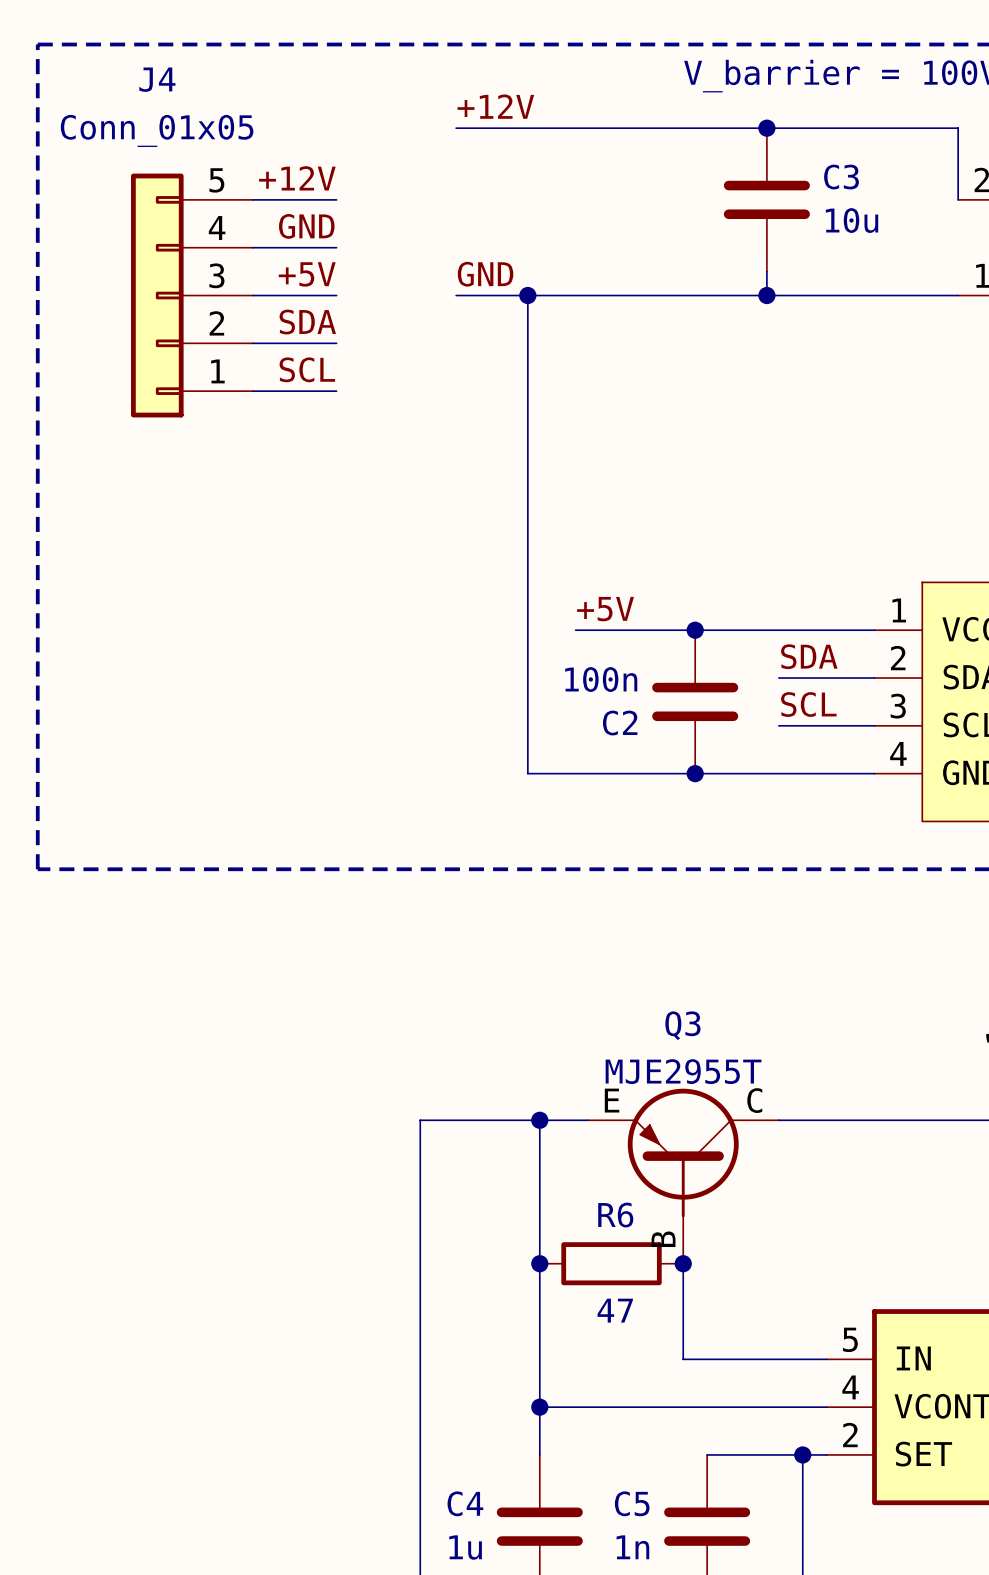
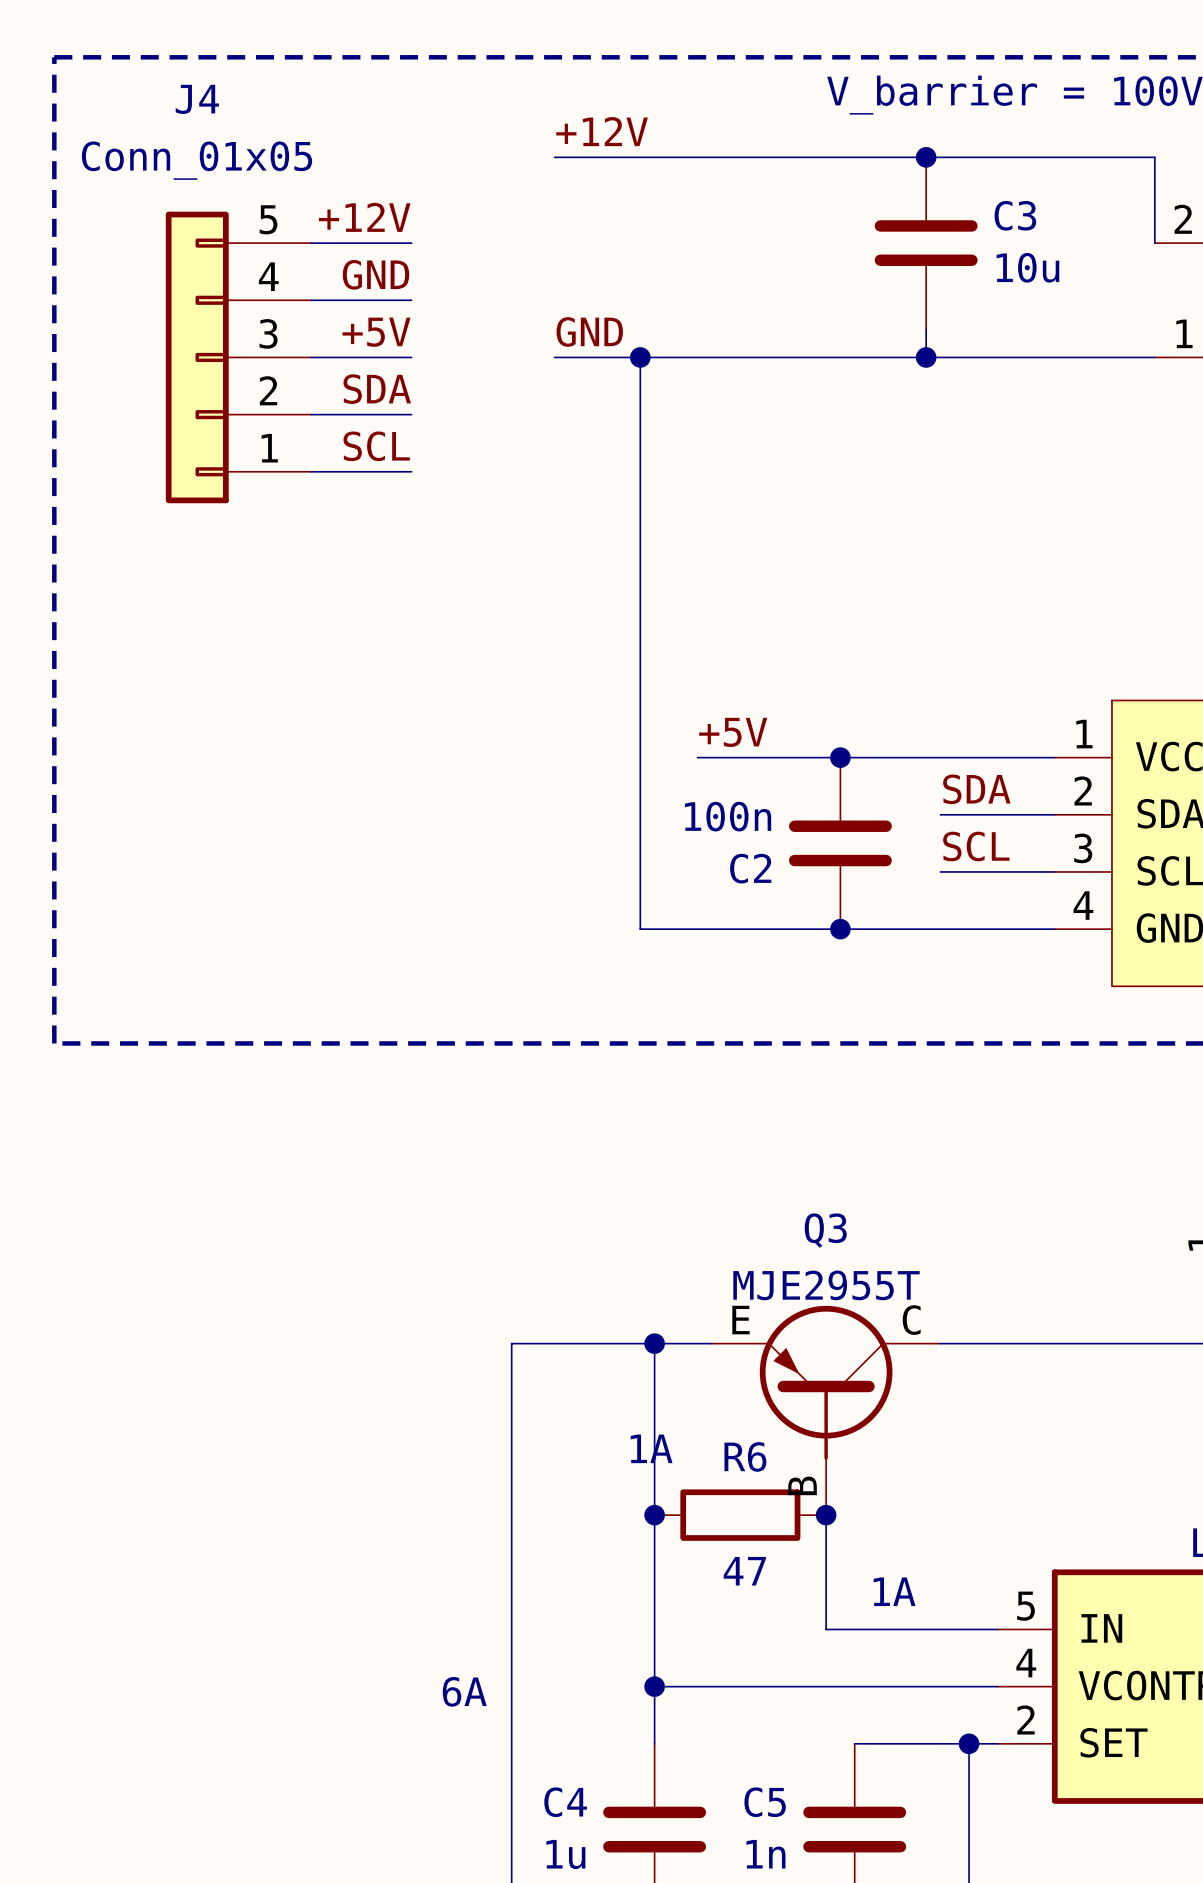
text: none -> 1A (651, 1448)
text: none -> 1A (894, 1591)
text: none -> 6A (464, 1691)

